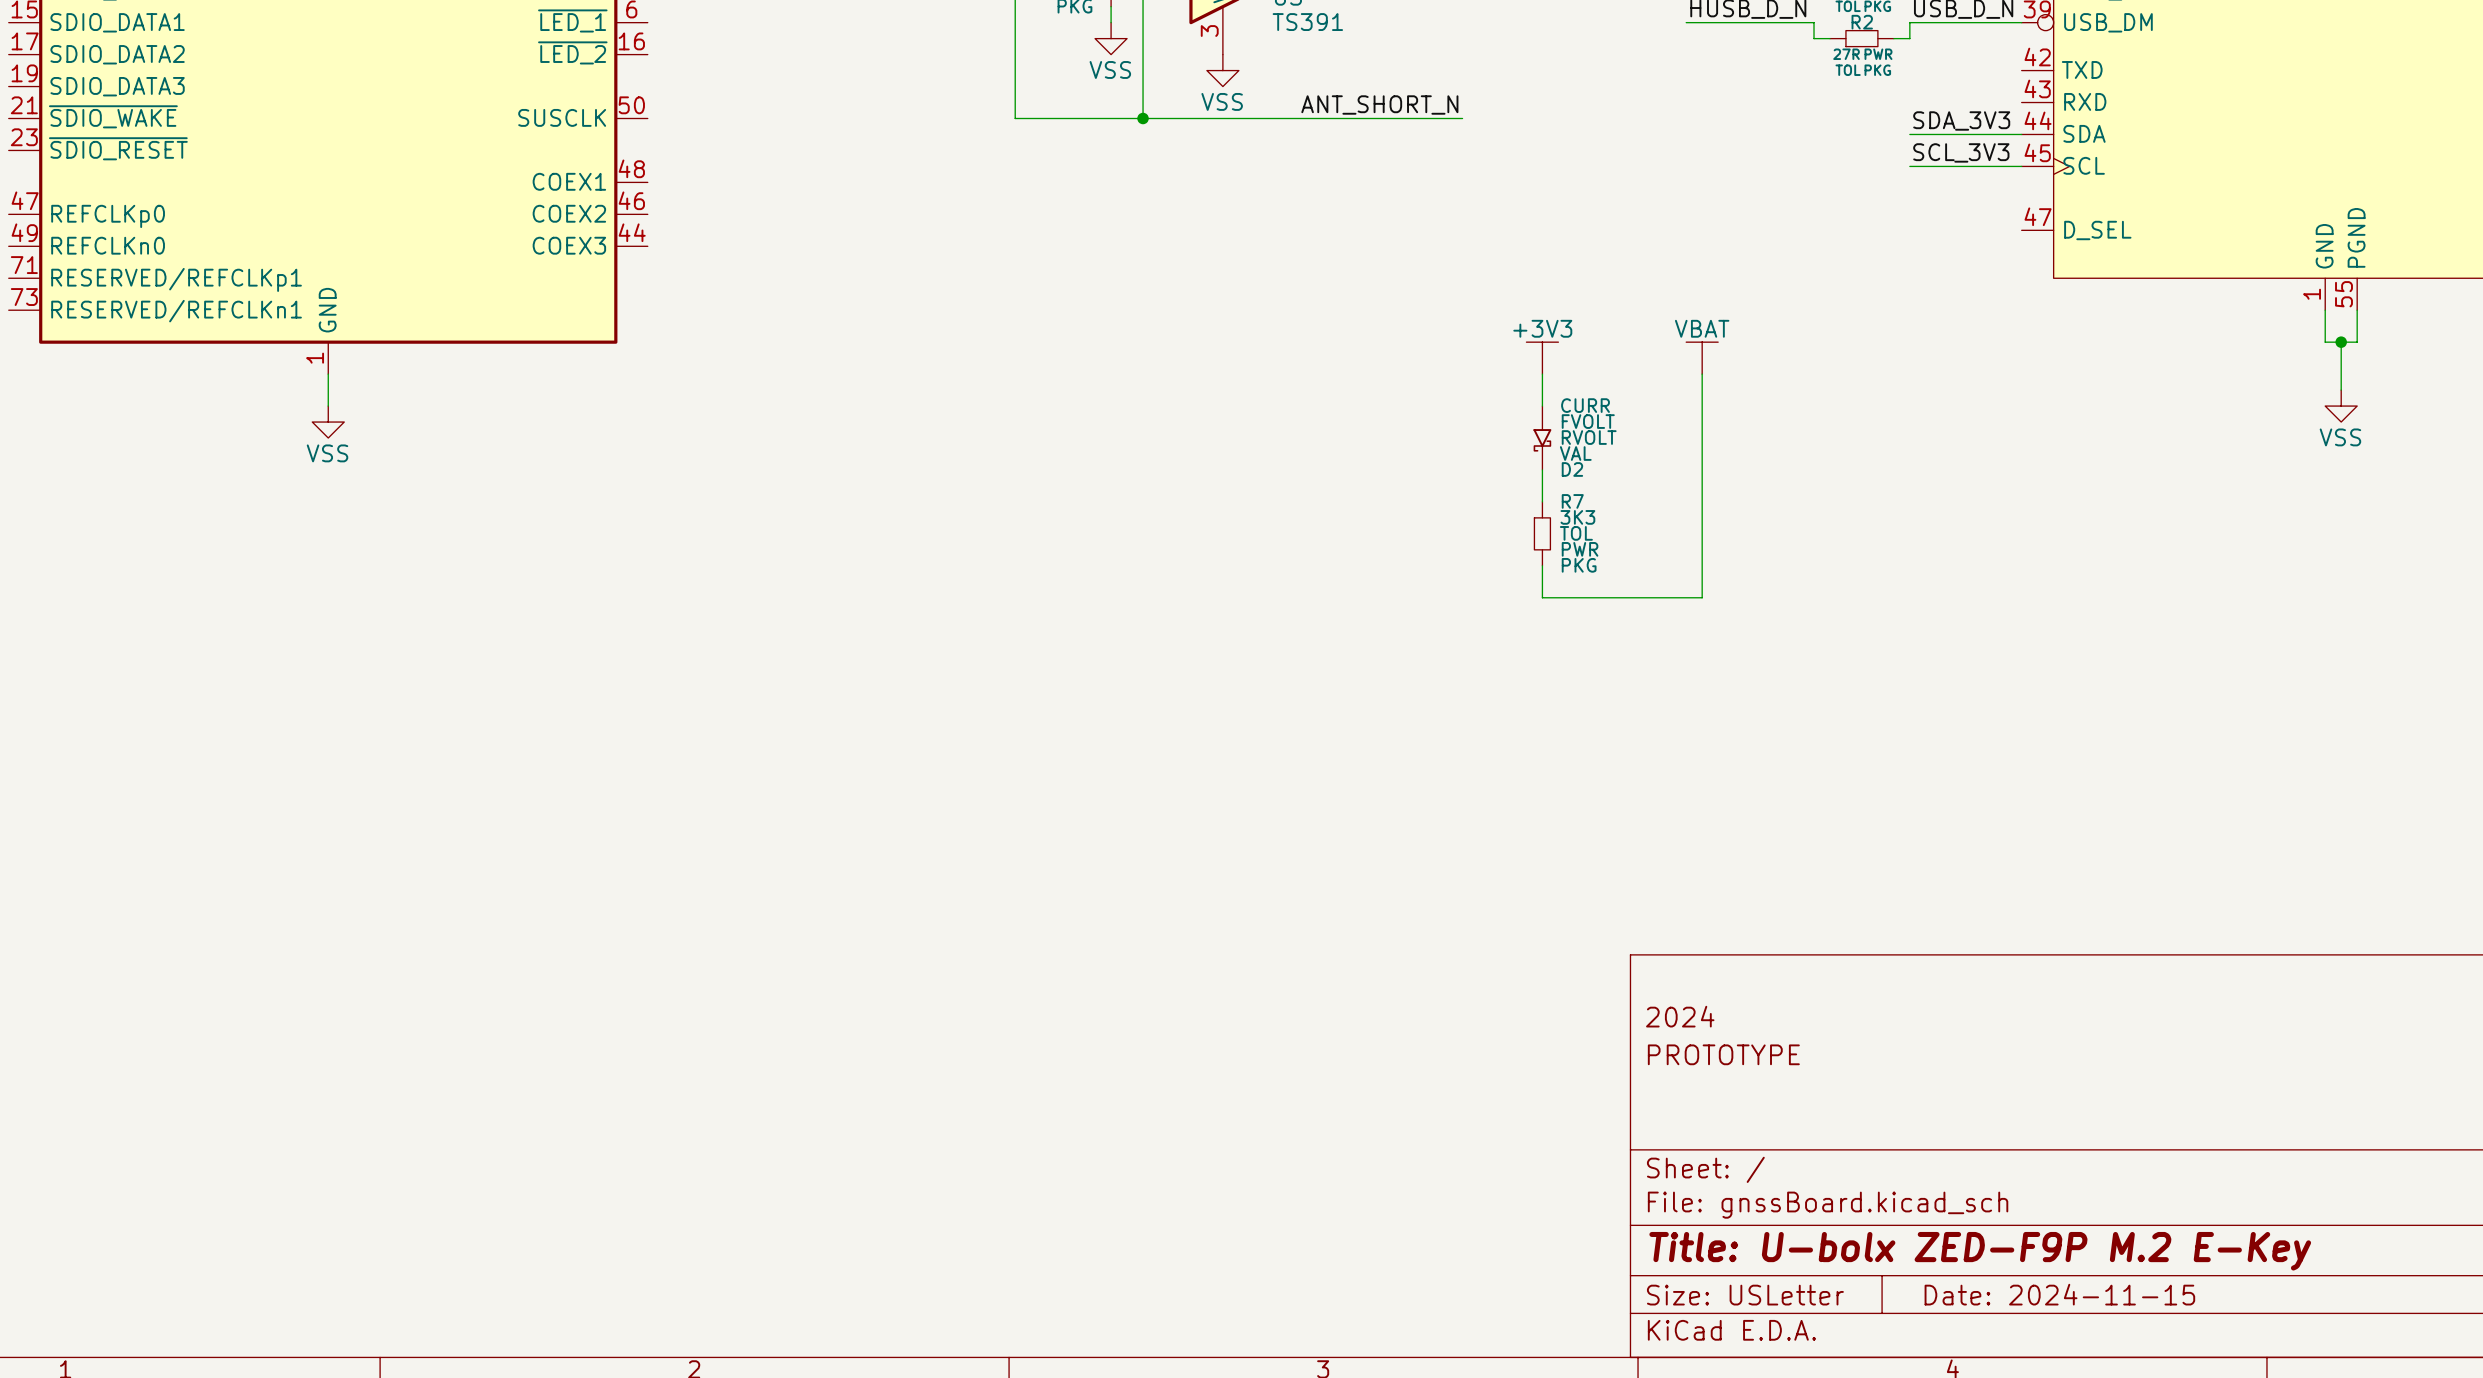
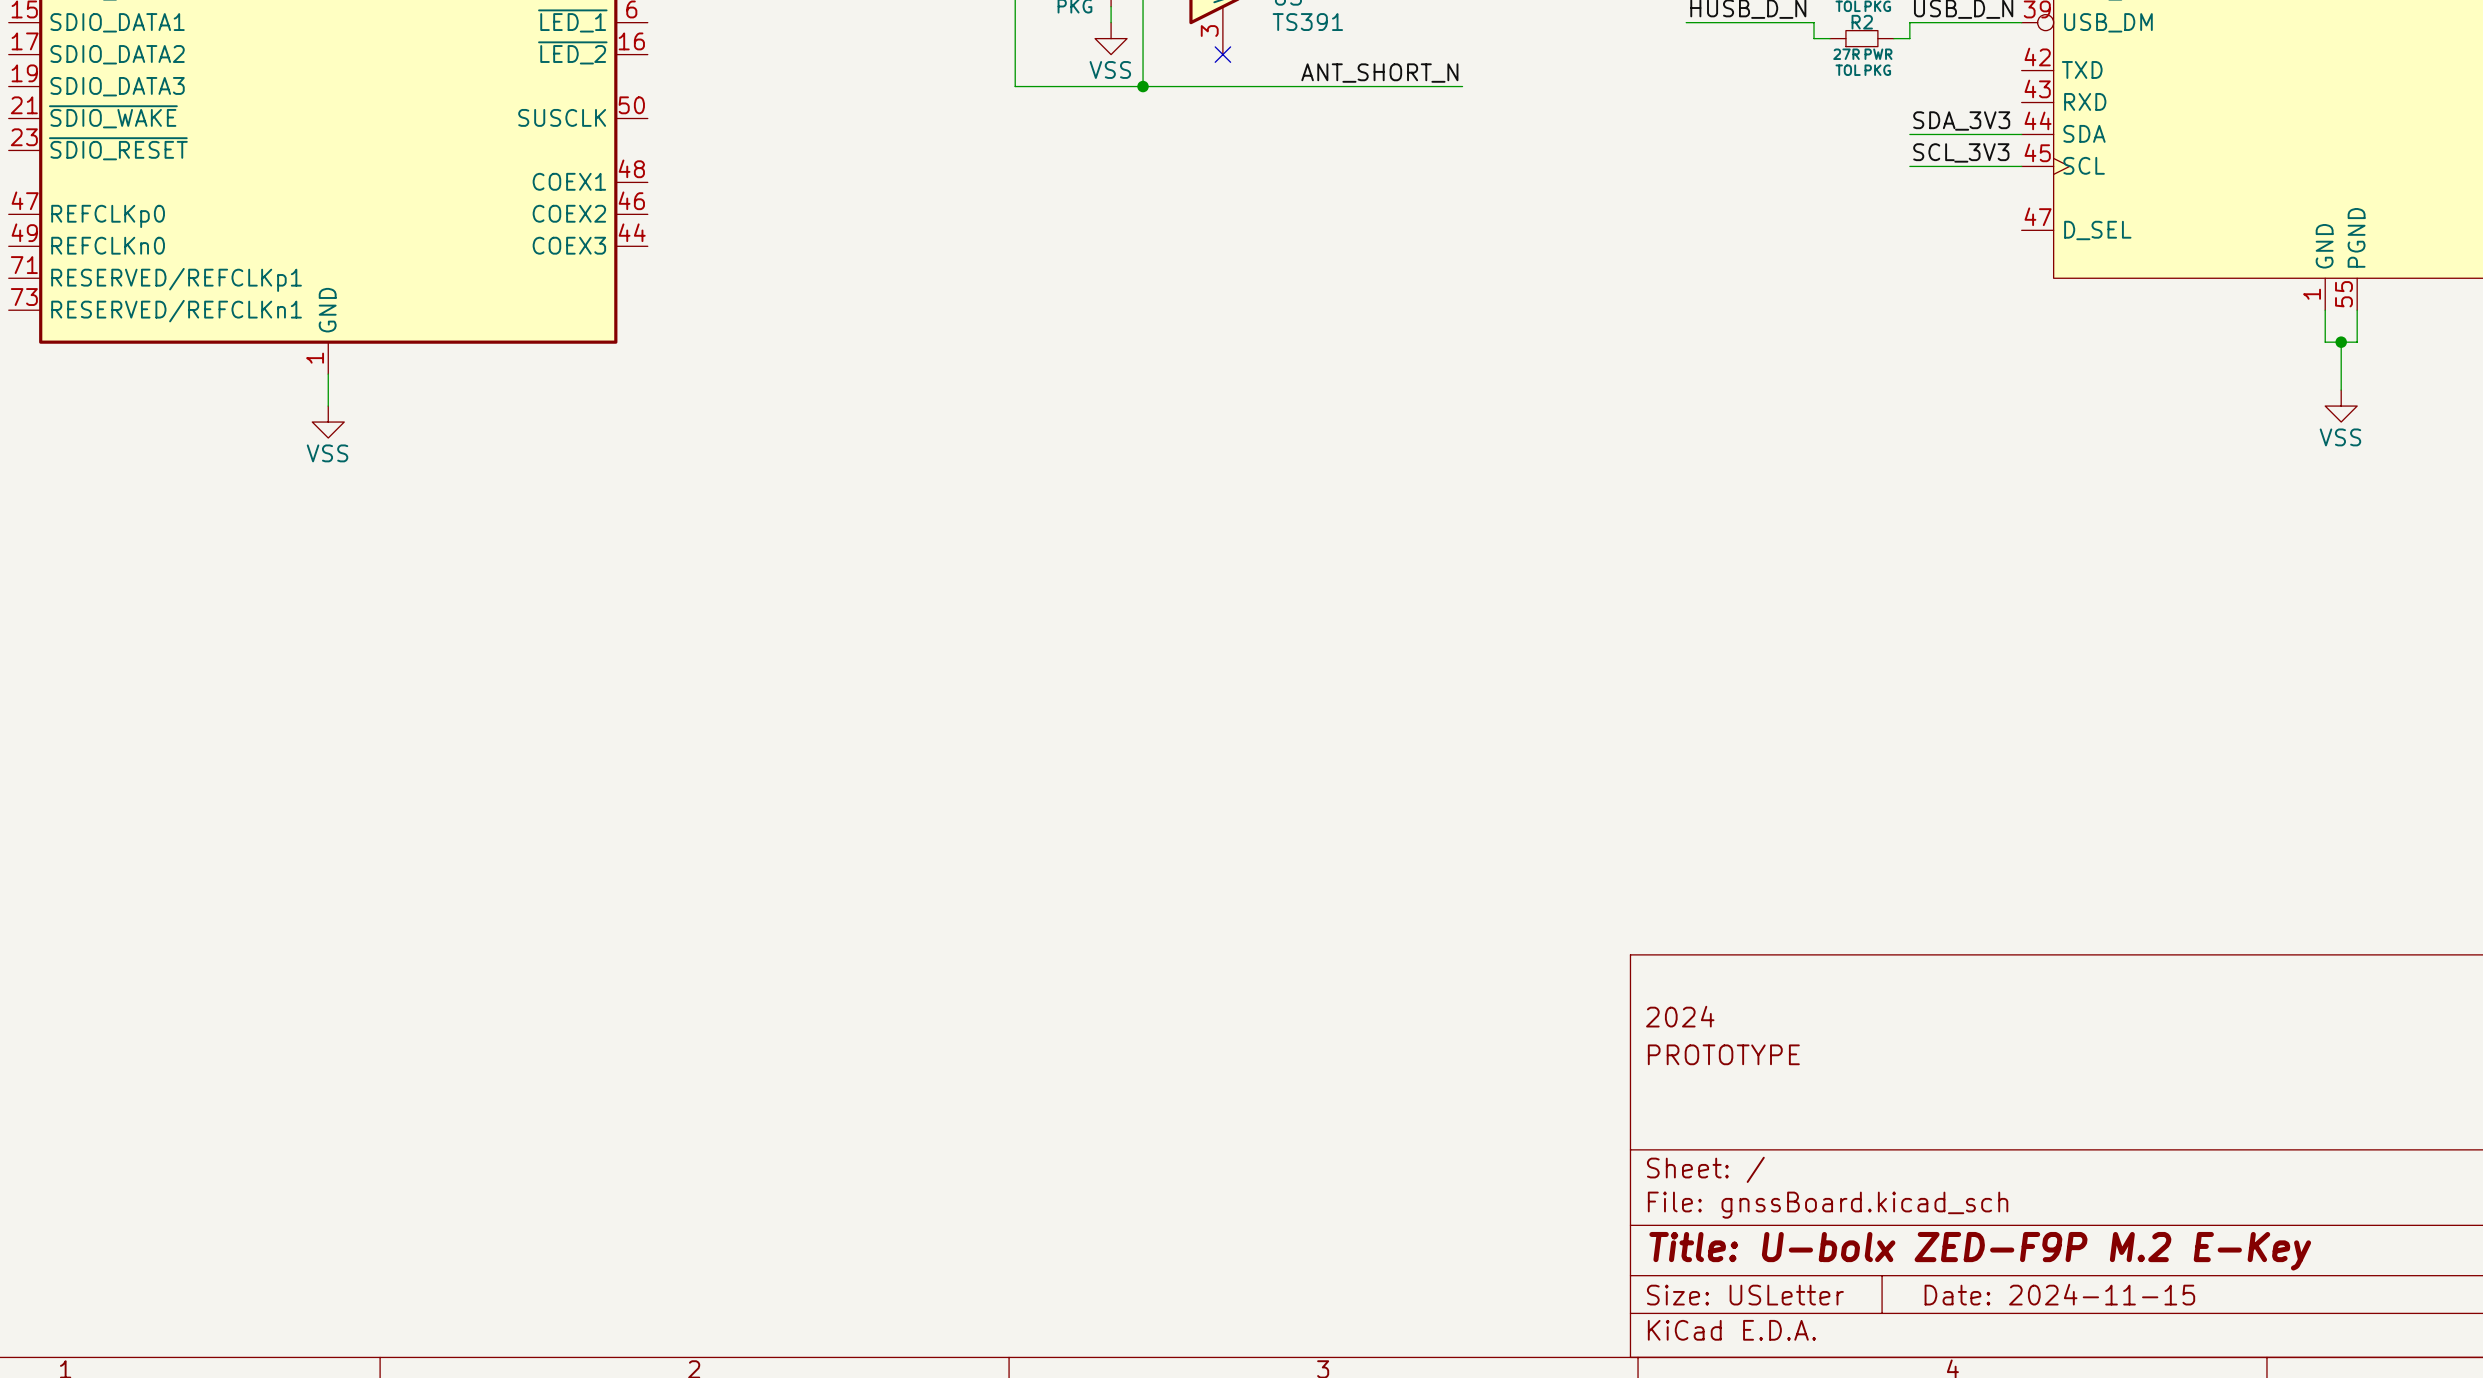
no-connect mark: none -> (1222, 54)
power symbol: VSS (1222, 70) -> none
wire: (1015, 86) (1015, 118) (1462, 118) -> (1015, 86) (1462, 86)
wire: (1143, 86) (1143, 118) -> none
label position: ANT_SHORT_N (1379, 105) -> ANT_SHORT_N (1379, 73)
junction position: (1143, 118) -> (1143, 86)
power symbol: +3V3 (1542, 358) -> none
power symbol: VBAT (1702, 358) -> none
wire: (1542, 374) (1542, 406) -> none
wire: (1702, 374) (1702, 597) (1542, 597) (1542, 565) -> none
D2: VAL (1542, 438) -> none
wire: (1542, 469) (1542, 501) -> none
R7: 3K3 (1542, 533) -> none

